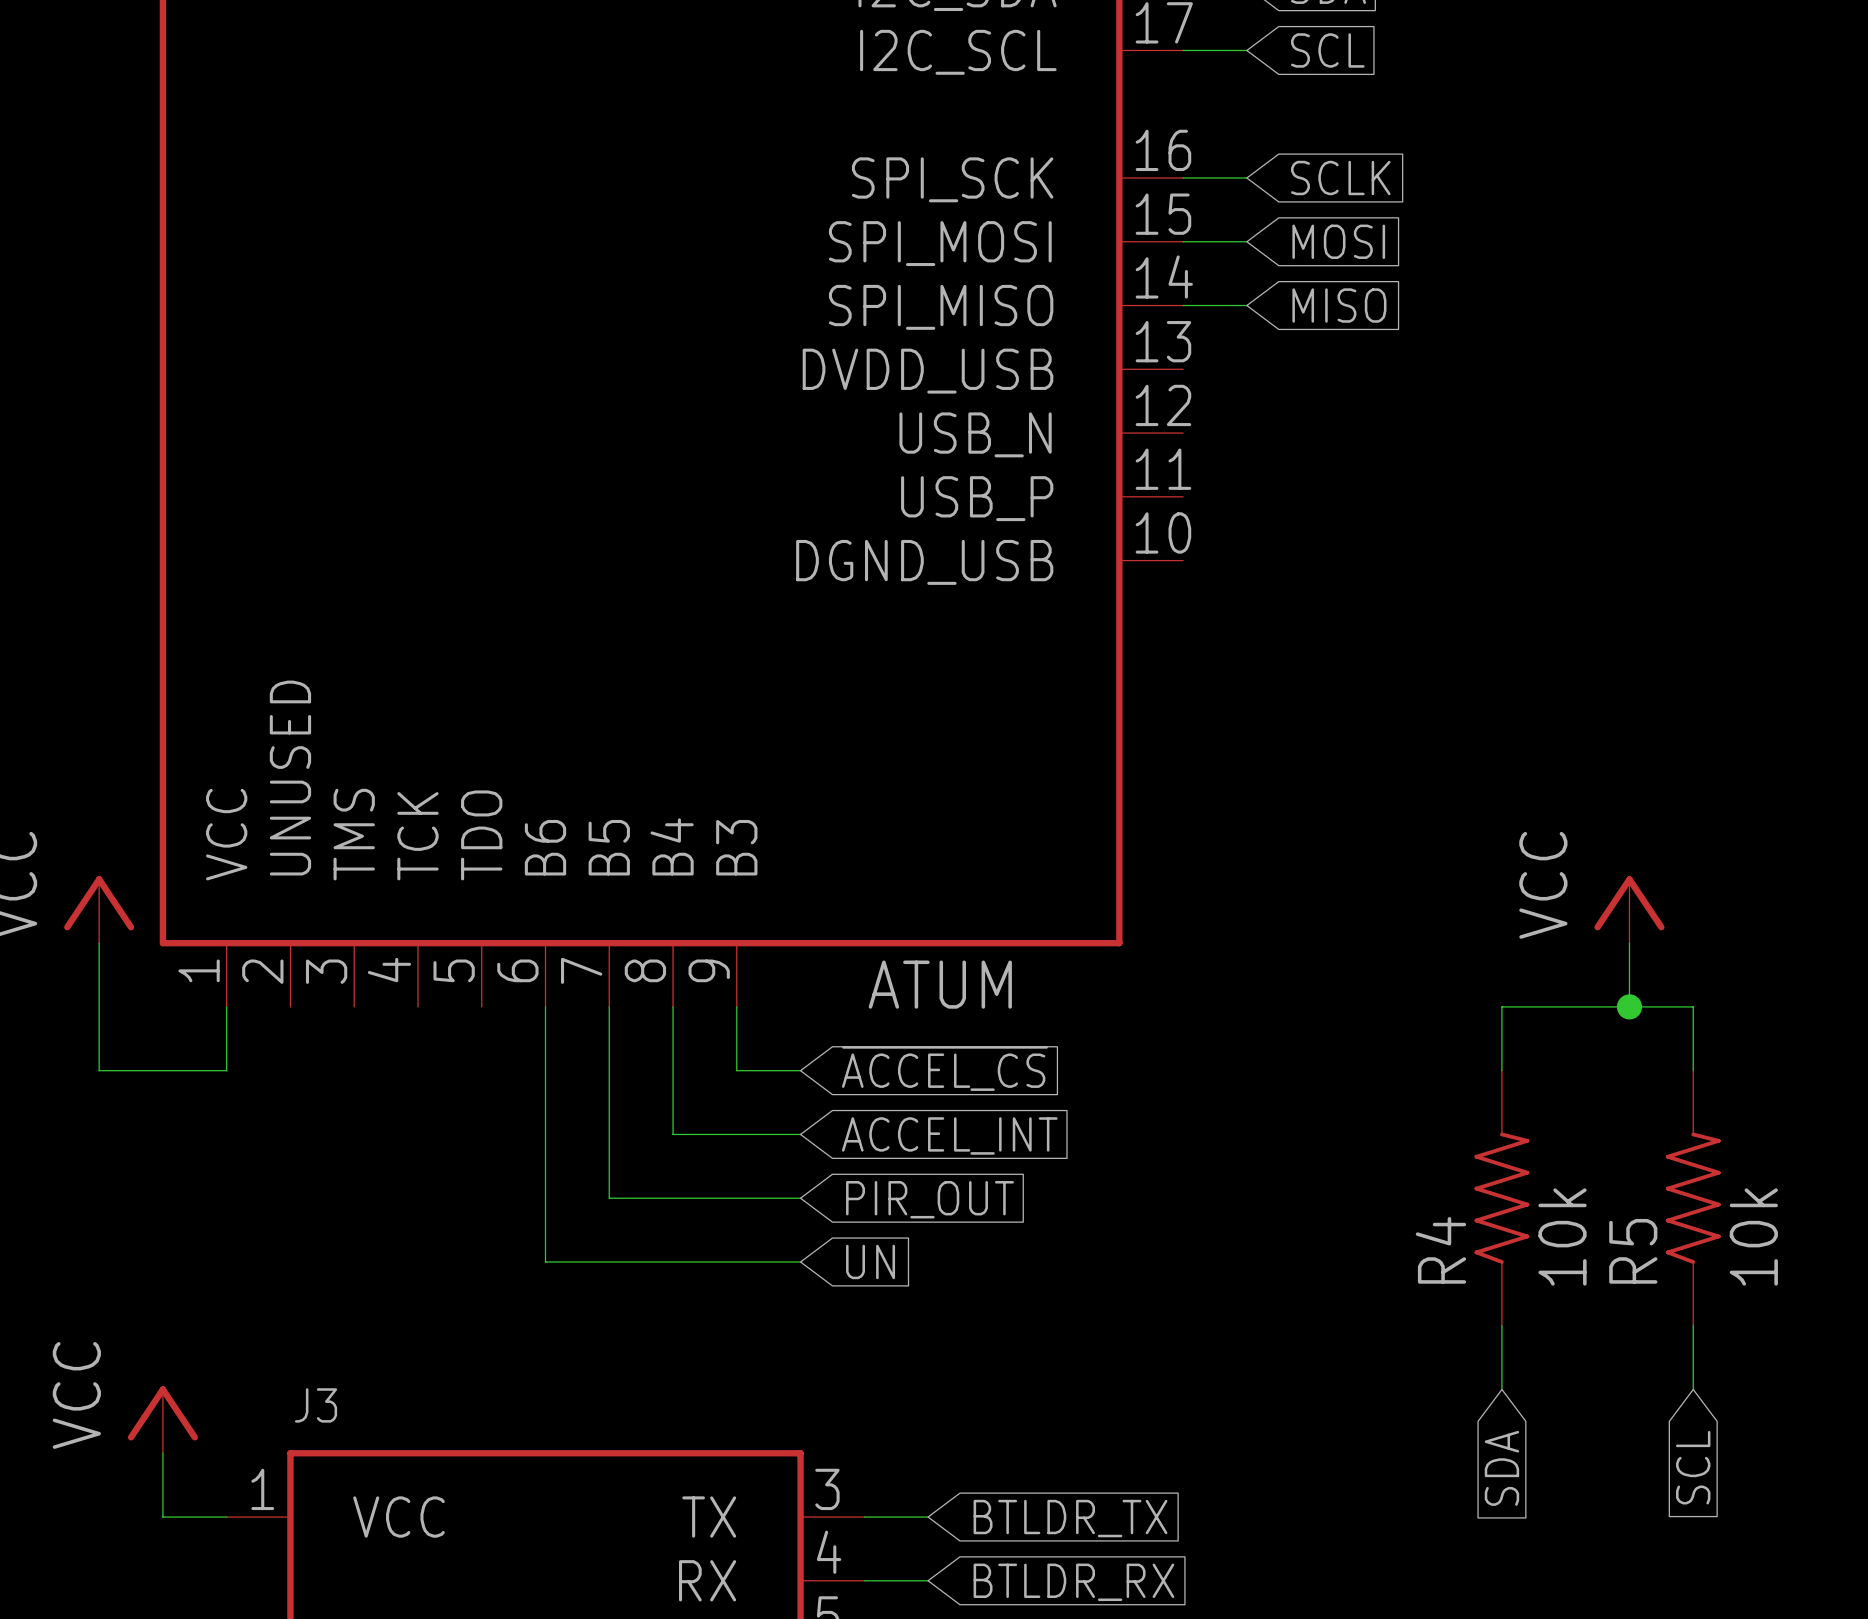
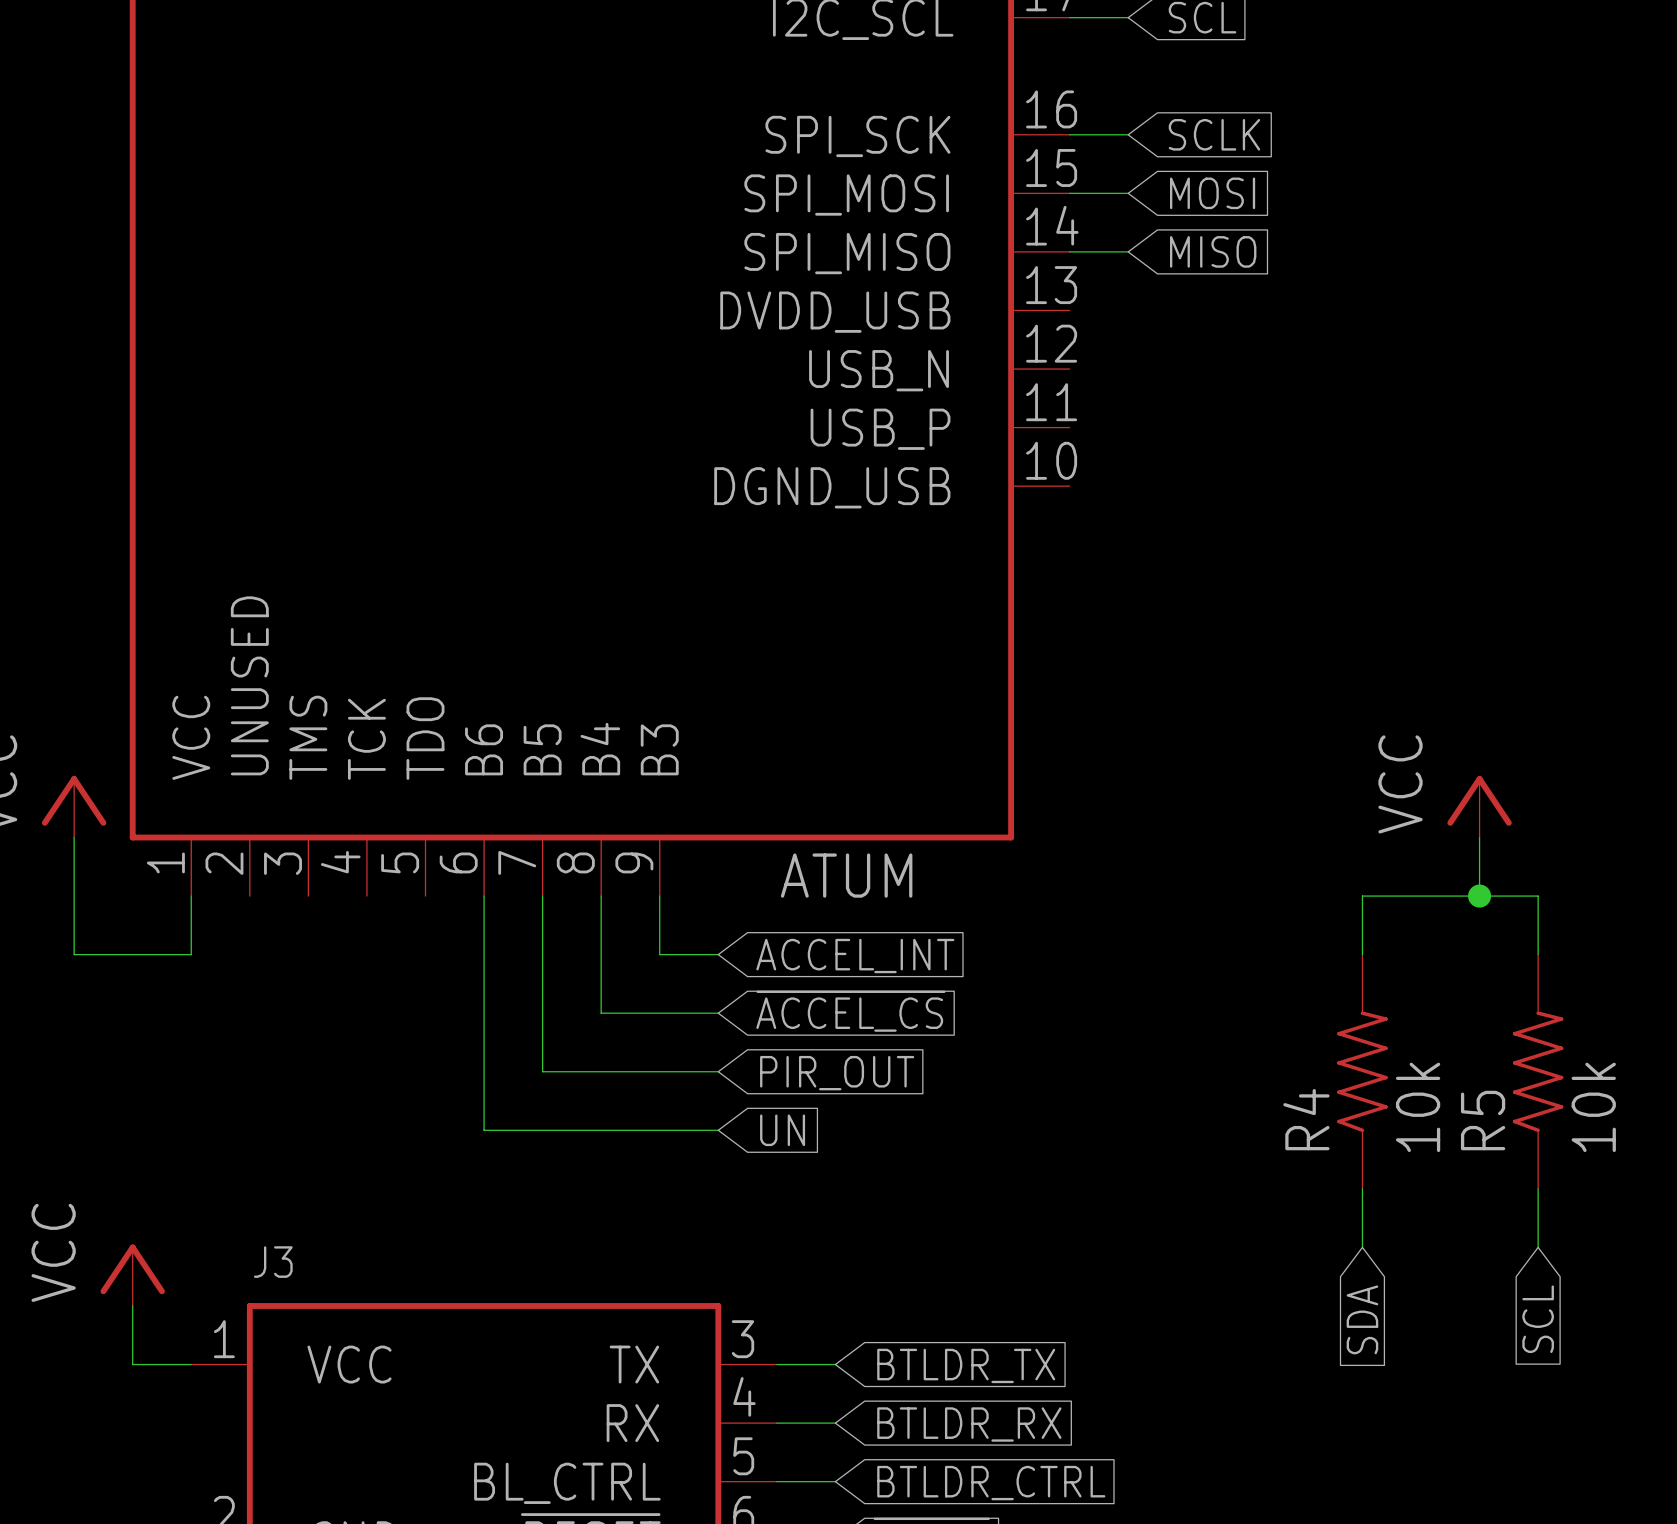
global label: ~{ACCEL_CS} (944, 1068) -> ACCEL_INT (855, 956)
global label: ACCEL_INT (949, 1135) -> ~{ACCEL_CS} (850, 1011)

